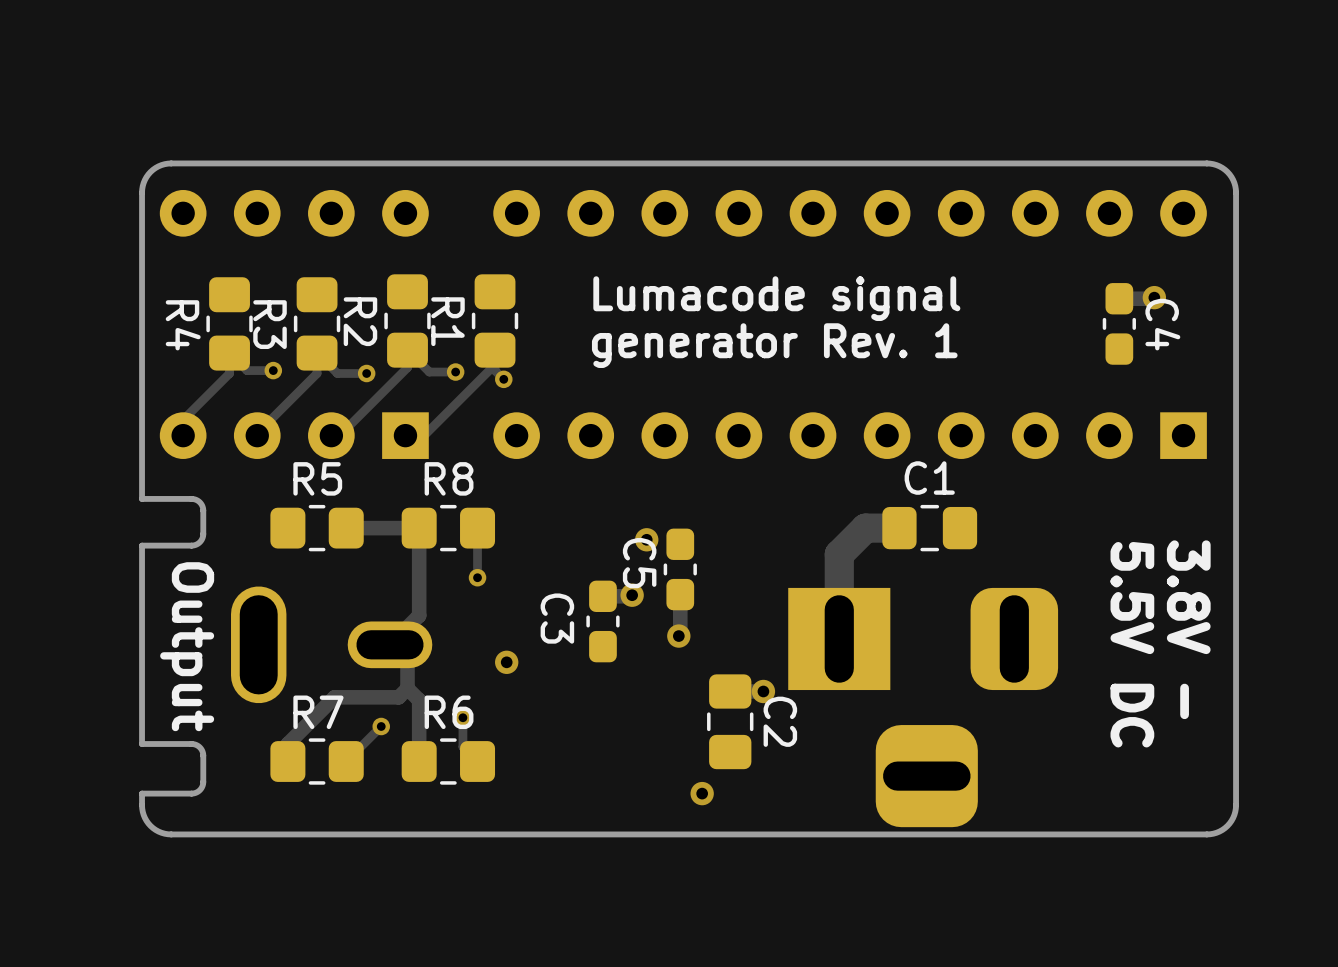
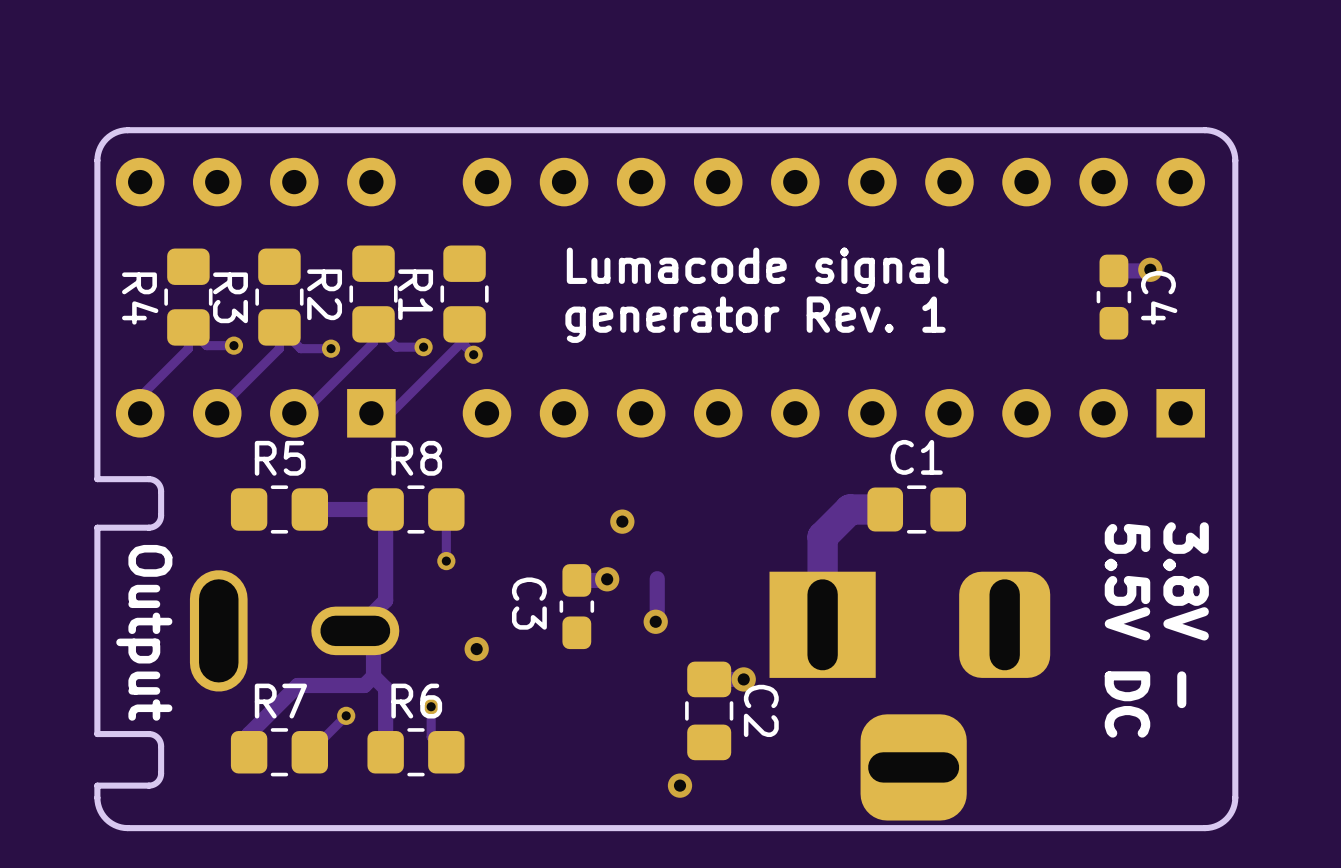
C5: (680, 569) -> none

